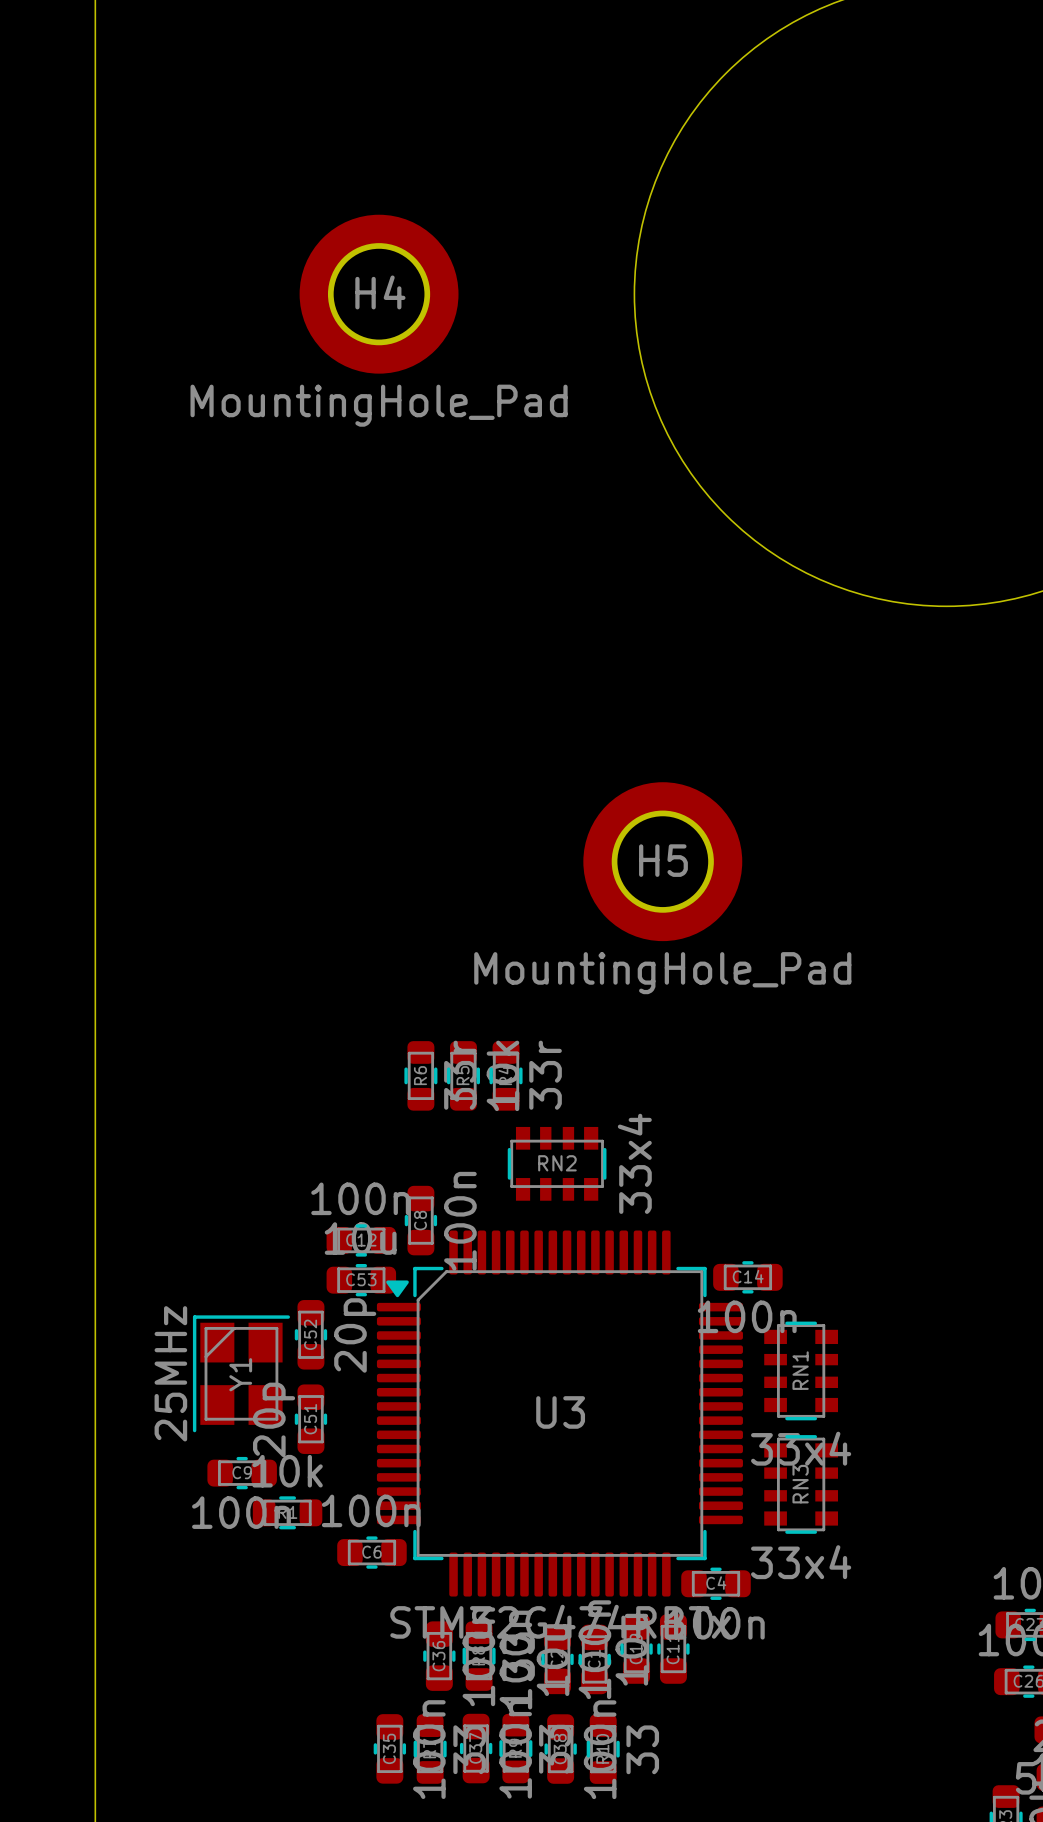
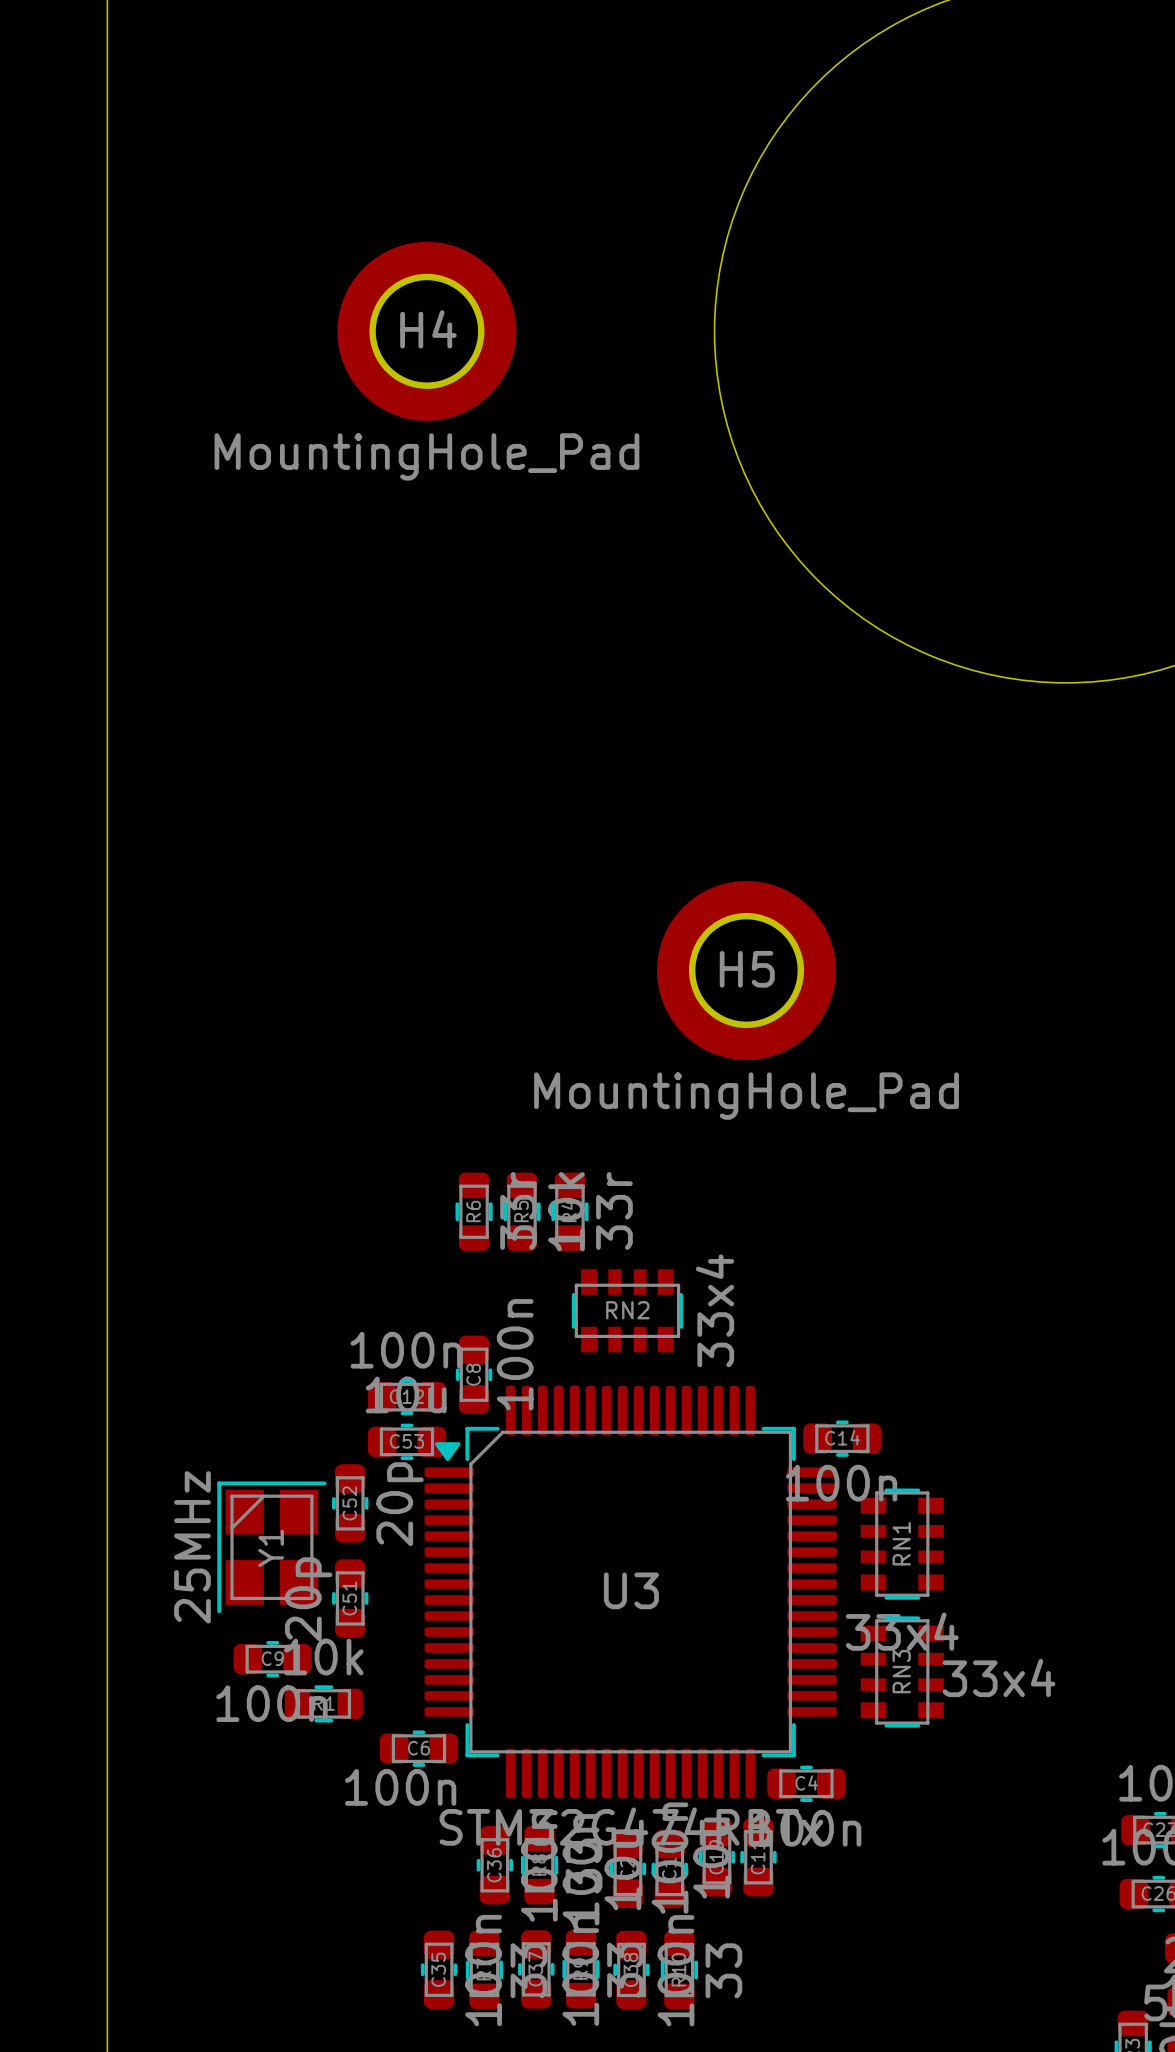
C8 value position: 100n (460, 1221) -> 100n (515, 1354)
C6 value position: 100n (371, 1510) -> 100n (400, 1787)
RN3 value position: 33x4 (801, 1562) -> 33x4 (998, 1677)

